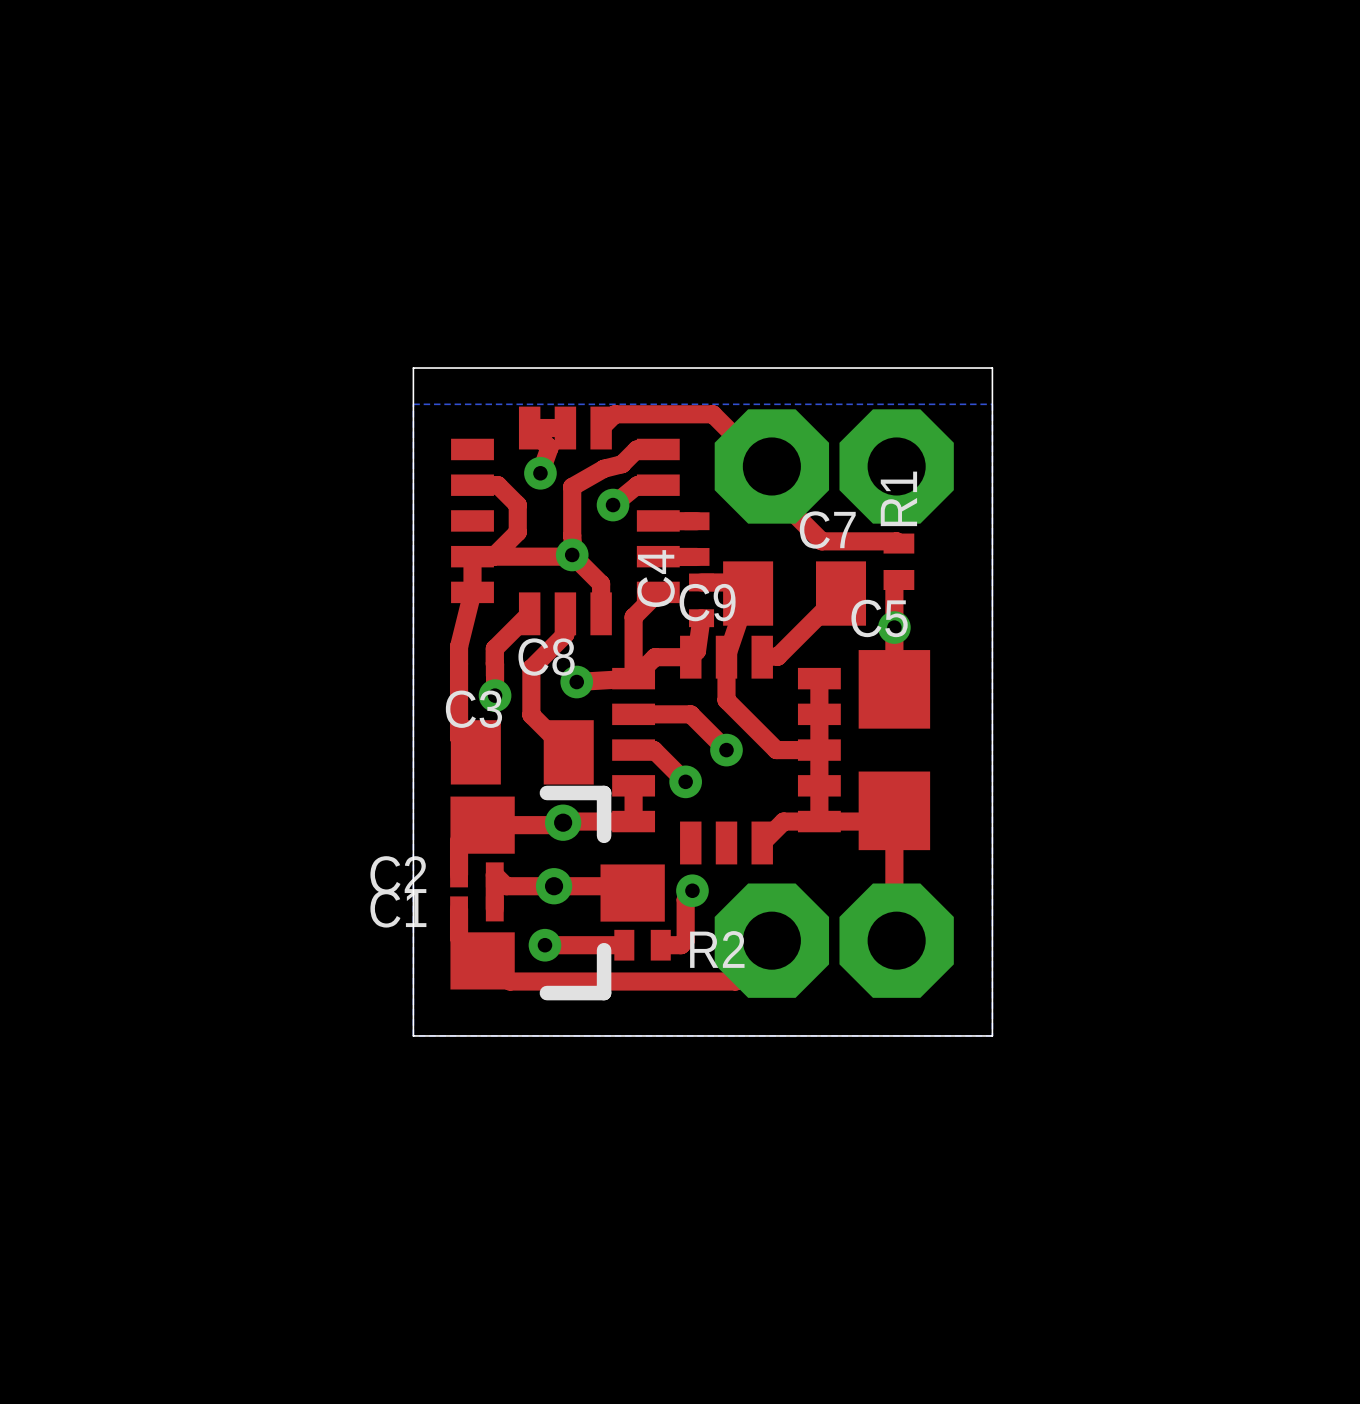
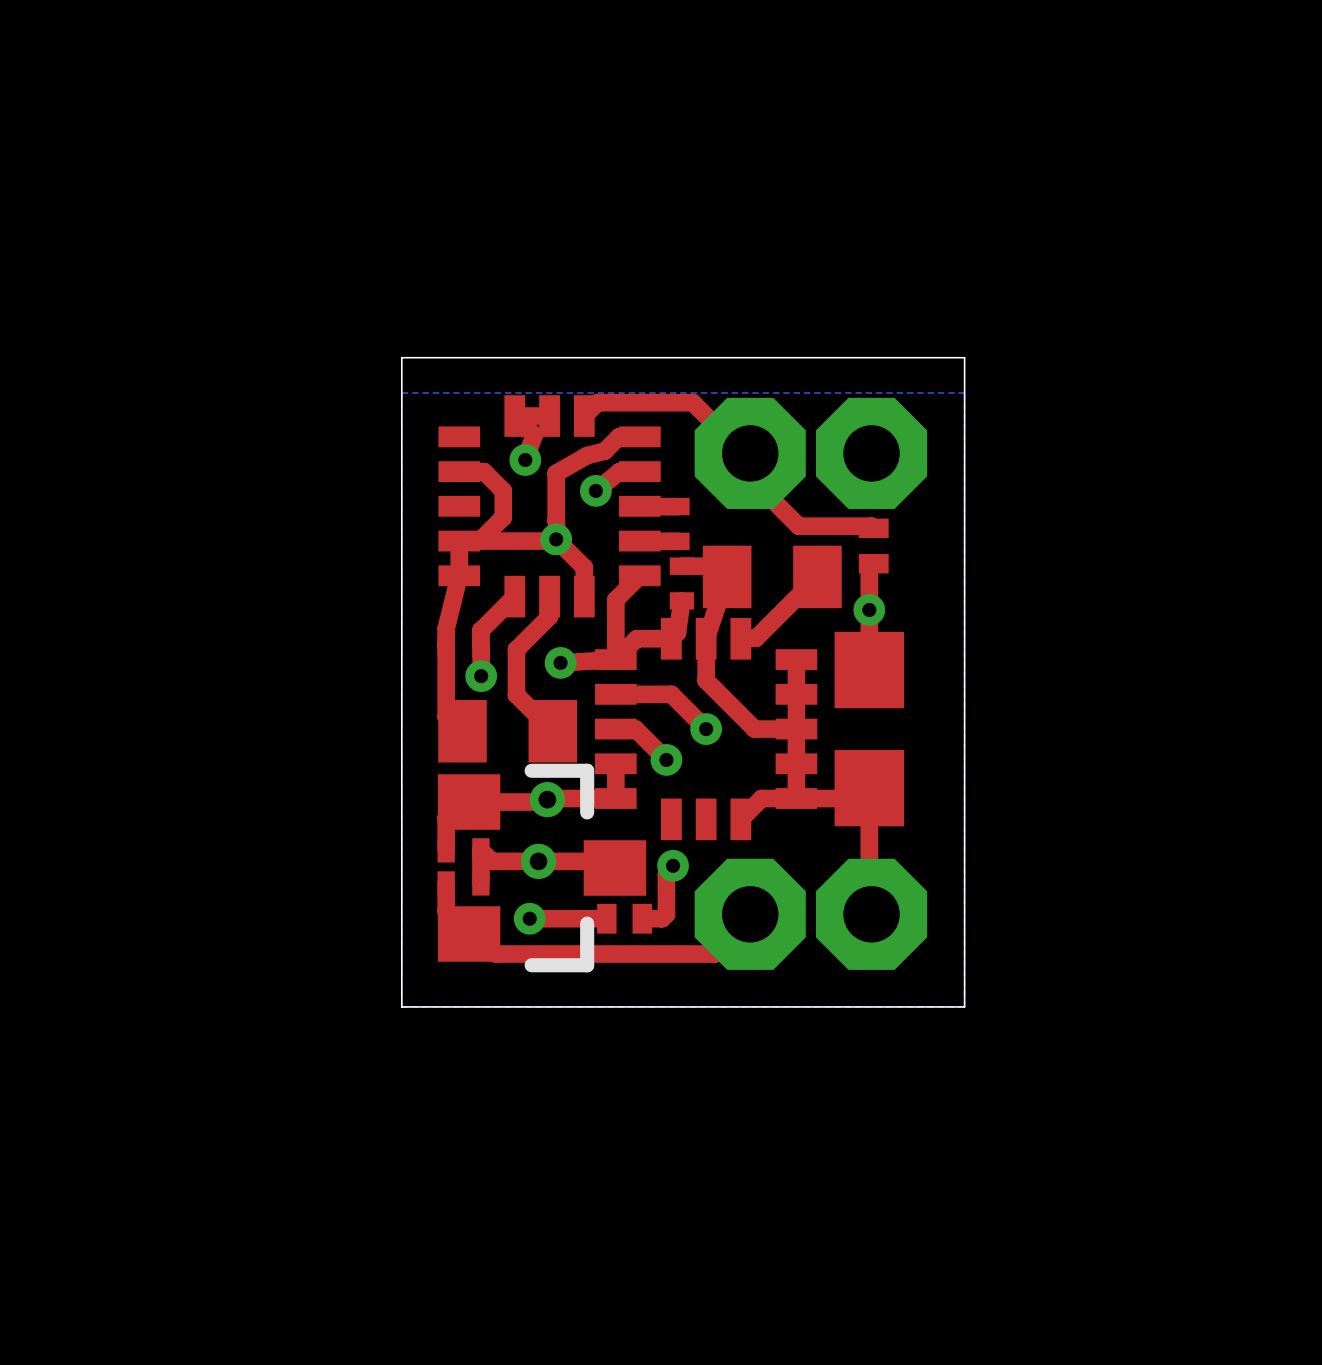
R1 name: R1 (898, 498) -> none
C7 name: C7 (827, 529) -> none
C4 name: C4 (656, 578) -> none
C9 name: C9 (707, 602) -> none
C5 name: C5 (879, 618) -> none
C8 name: C8 (546, 657) -> none
C3 name: C3 (473, 709) -> none
C2 name: C2 (398, 874) -> none
C1 name: C1 (398, 908) -> none
R2 name: R2 (717, 949) -> none

